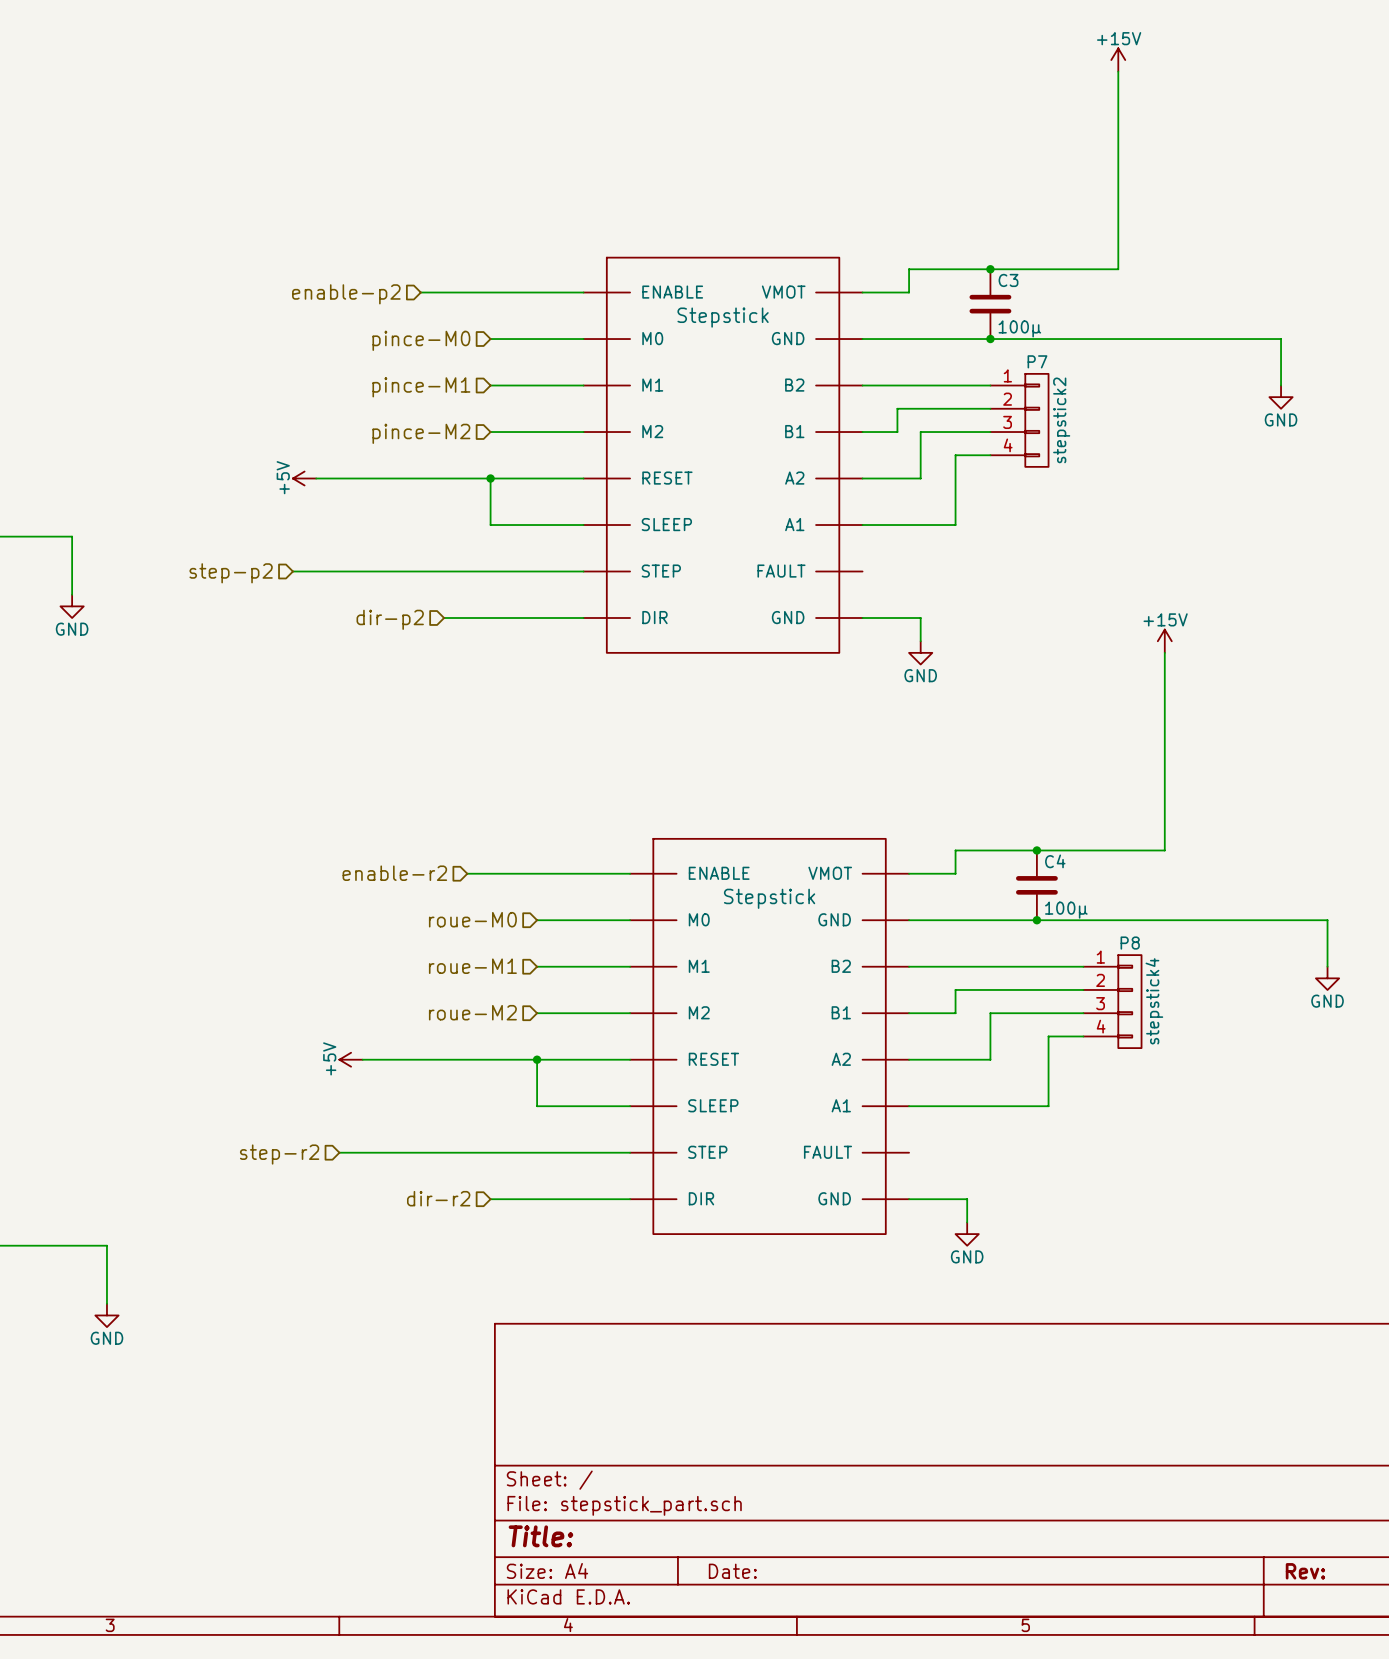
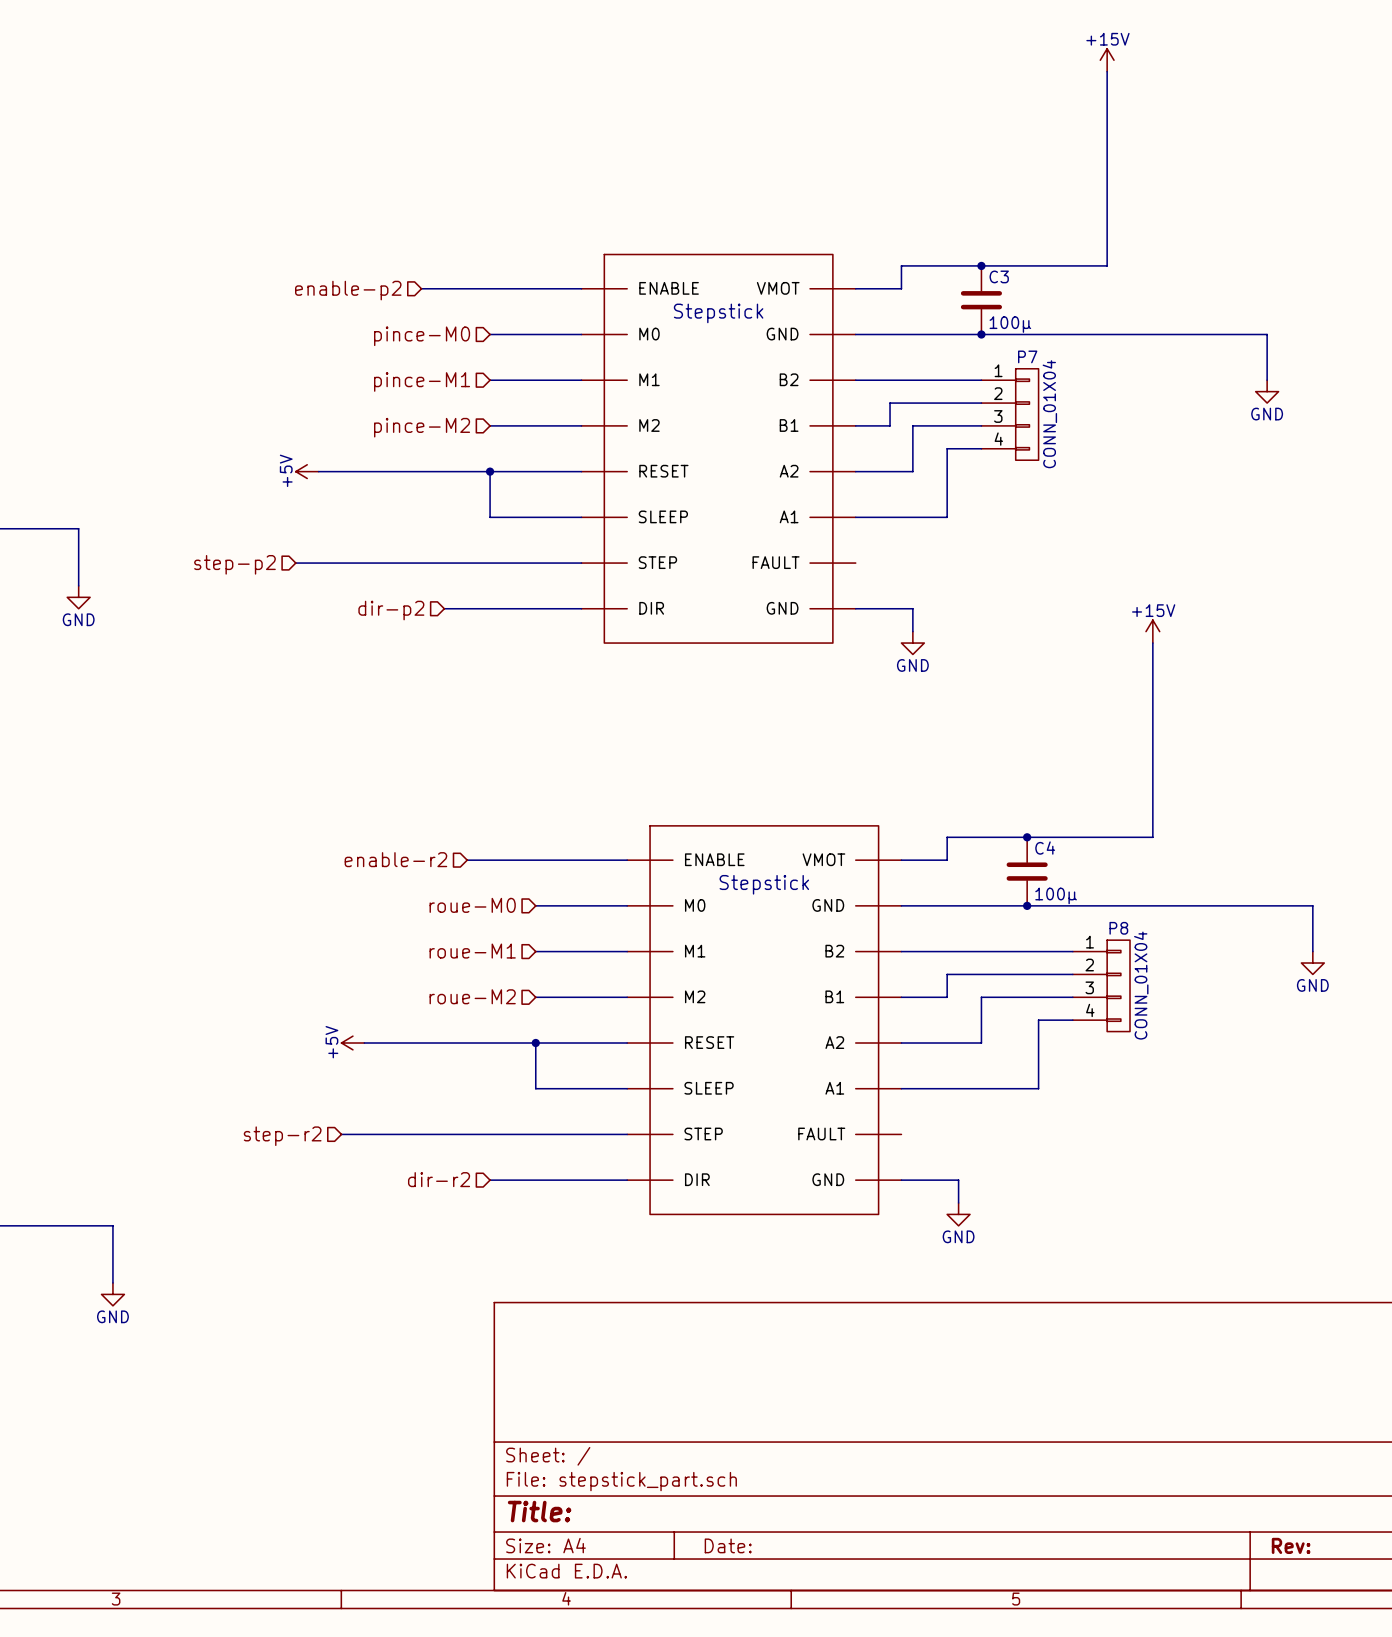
P7 value: stepstick2 (1061, 420) -> CONN_01X04 (1049, 414)
P8 value: stepstick4 (1154, 1001) -> CONN_01X04 (1141, 985)

